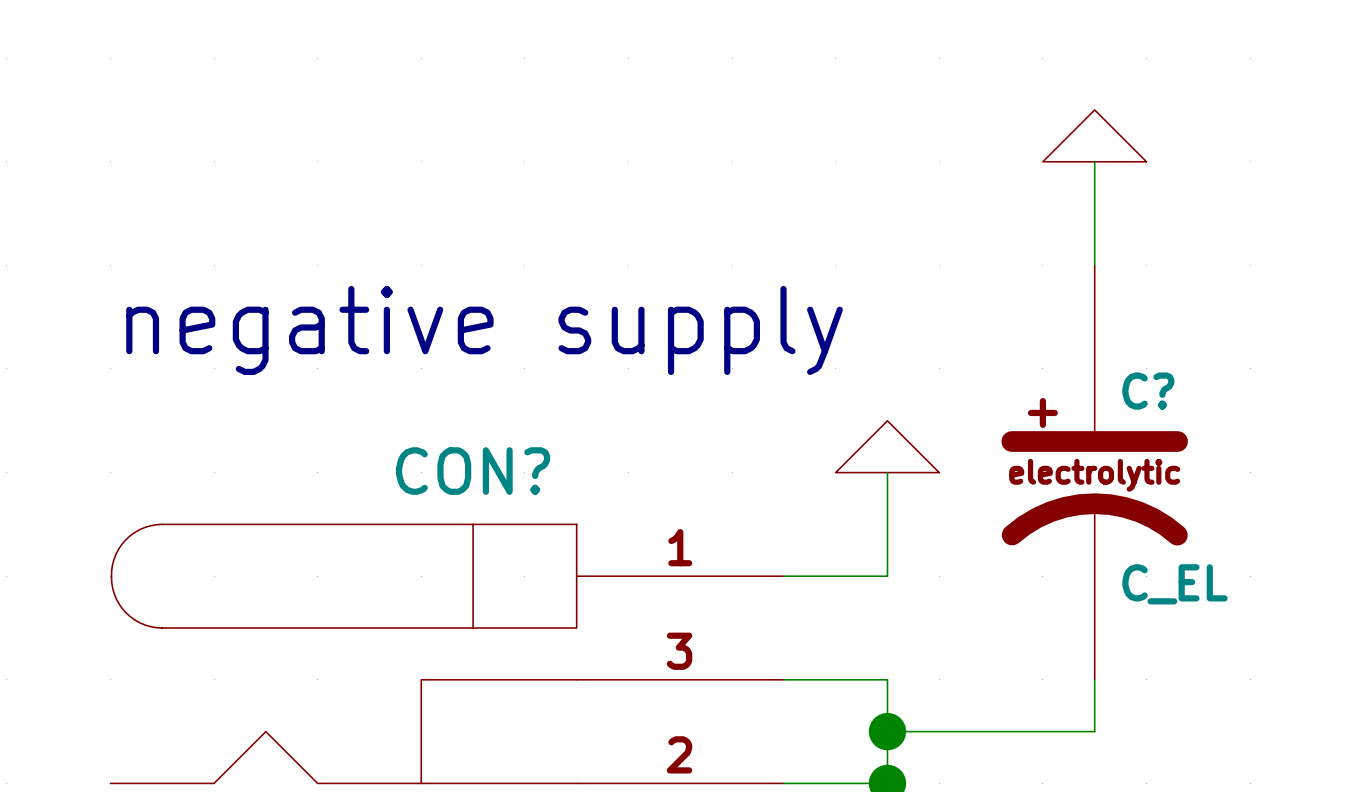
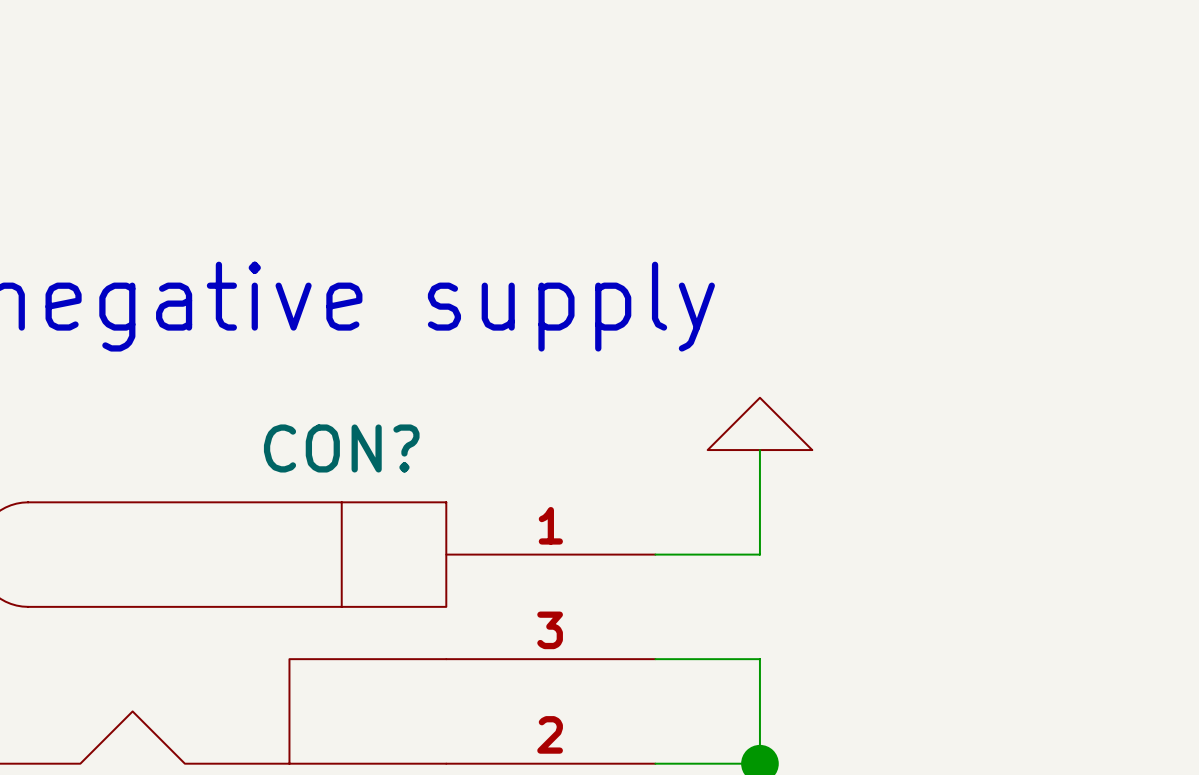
power symbol: (1094, 135) -> none
wire: (1094, 161) (1094, 265) -> none
C?: C_EL (1094, 472) -> none
wire: (1094, 679) (1094, 731) (887, 731) -> none
junction: (887, 731) -> none

